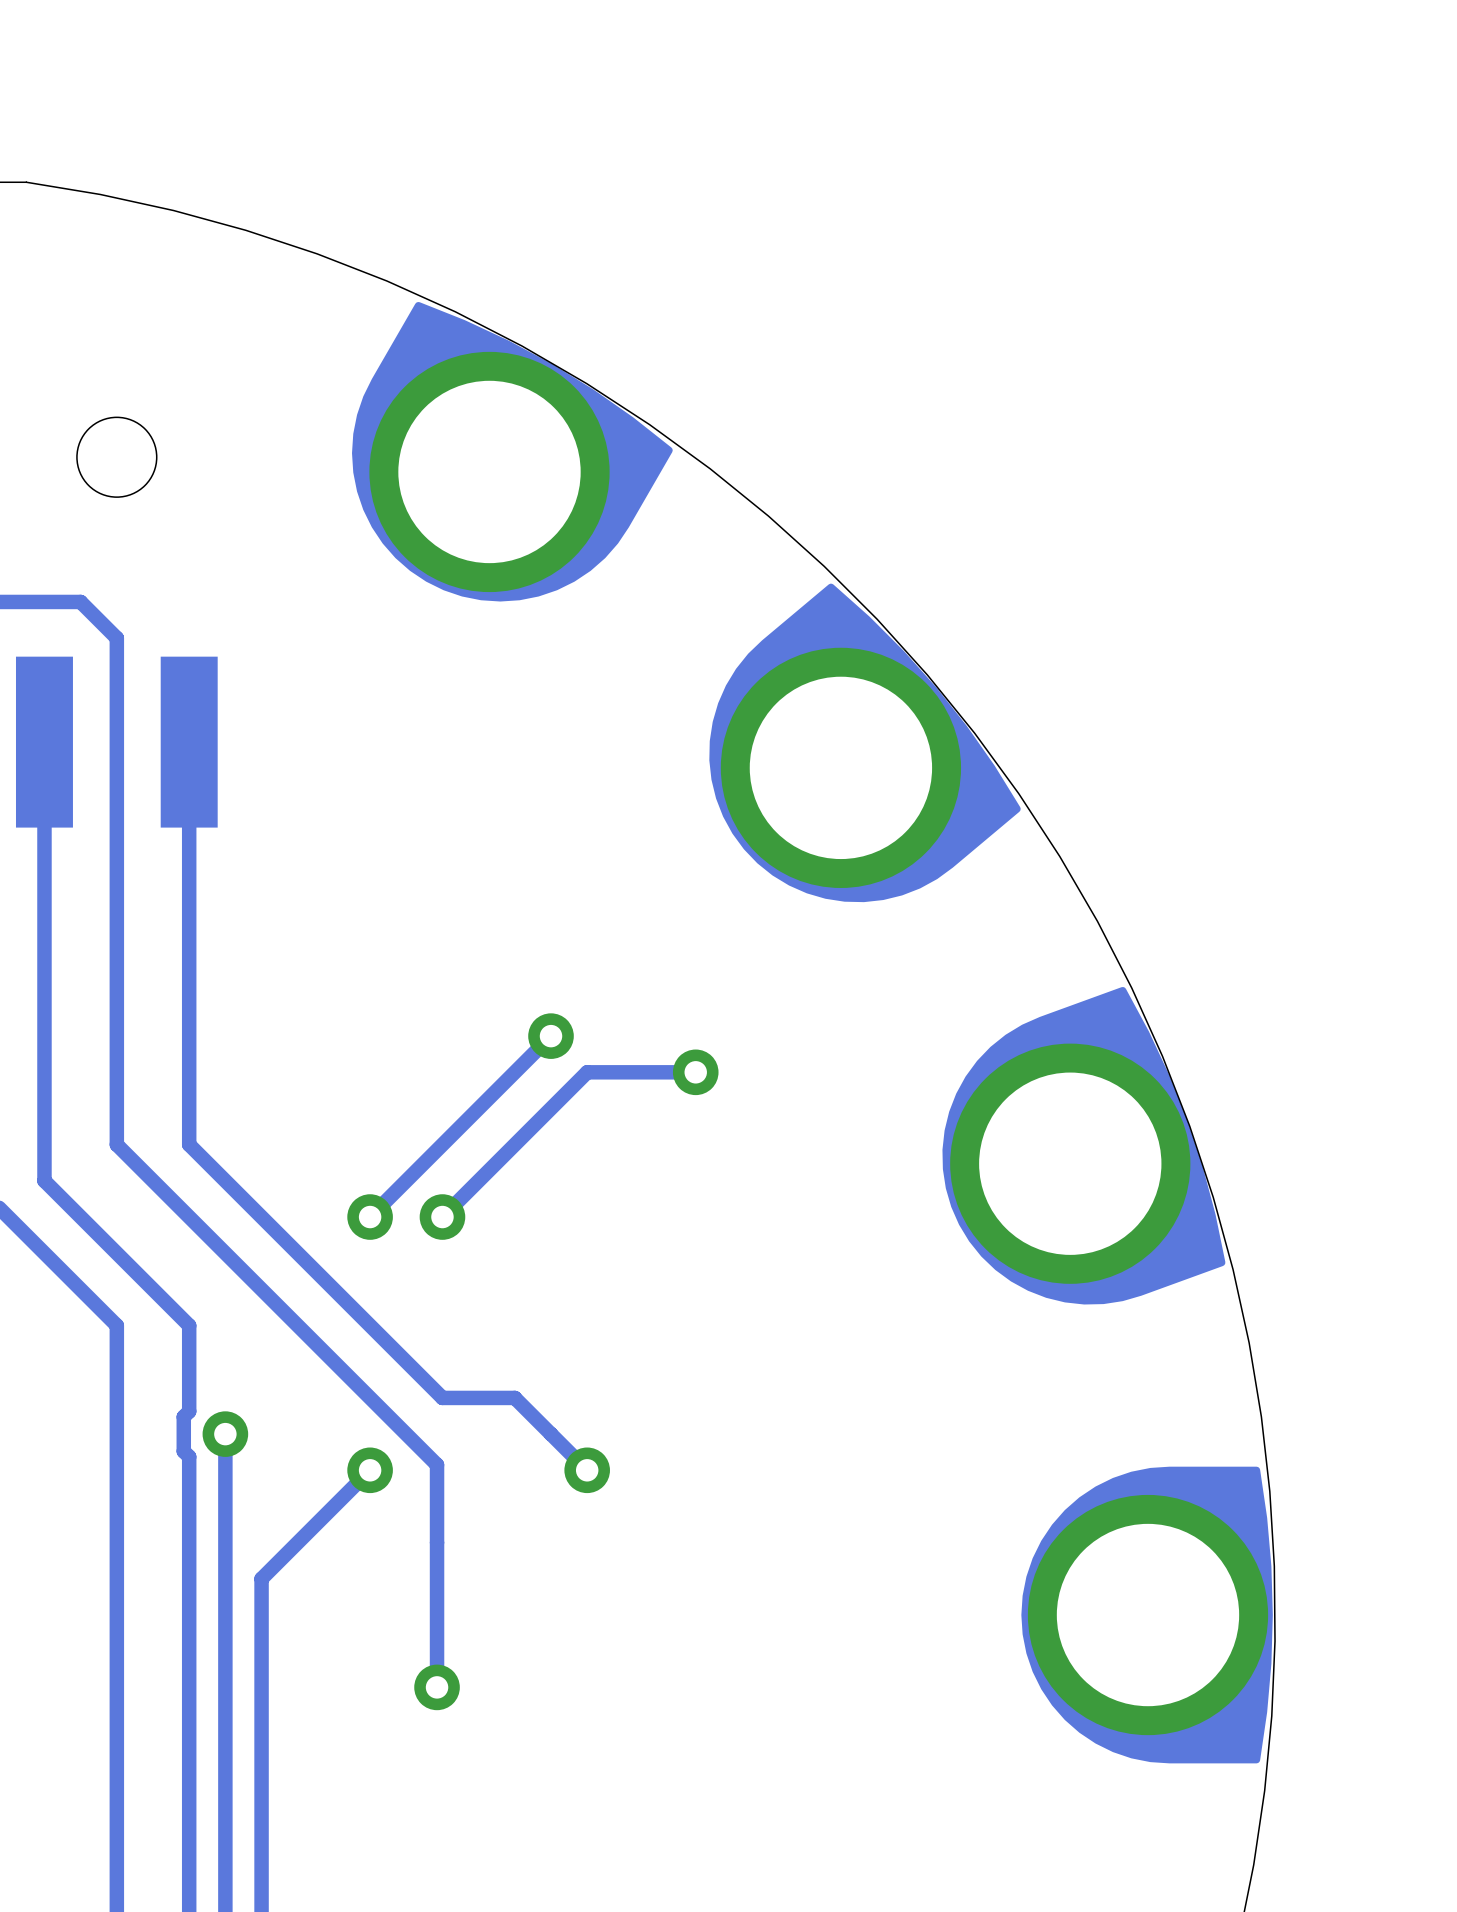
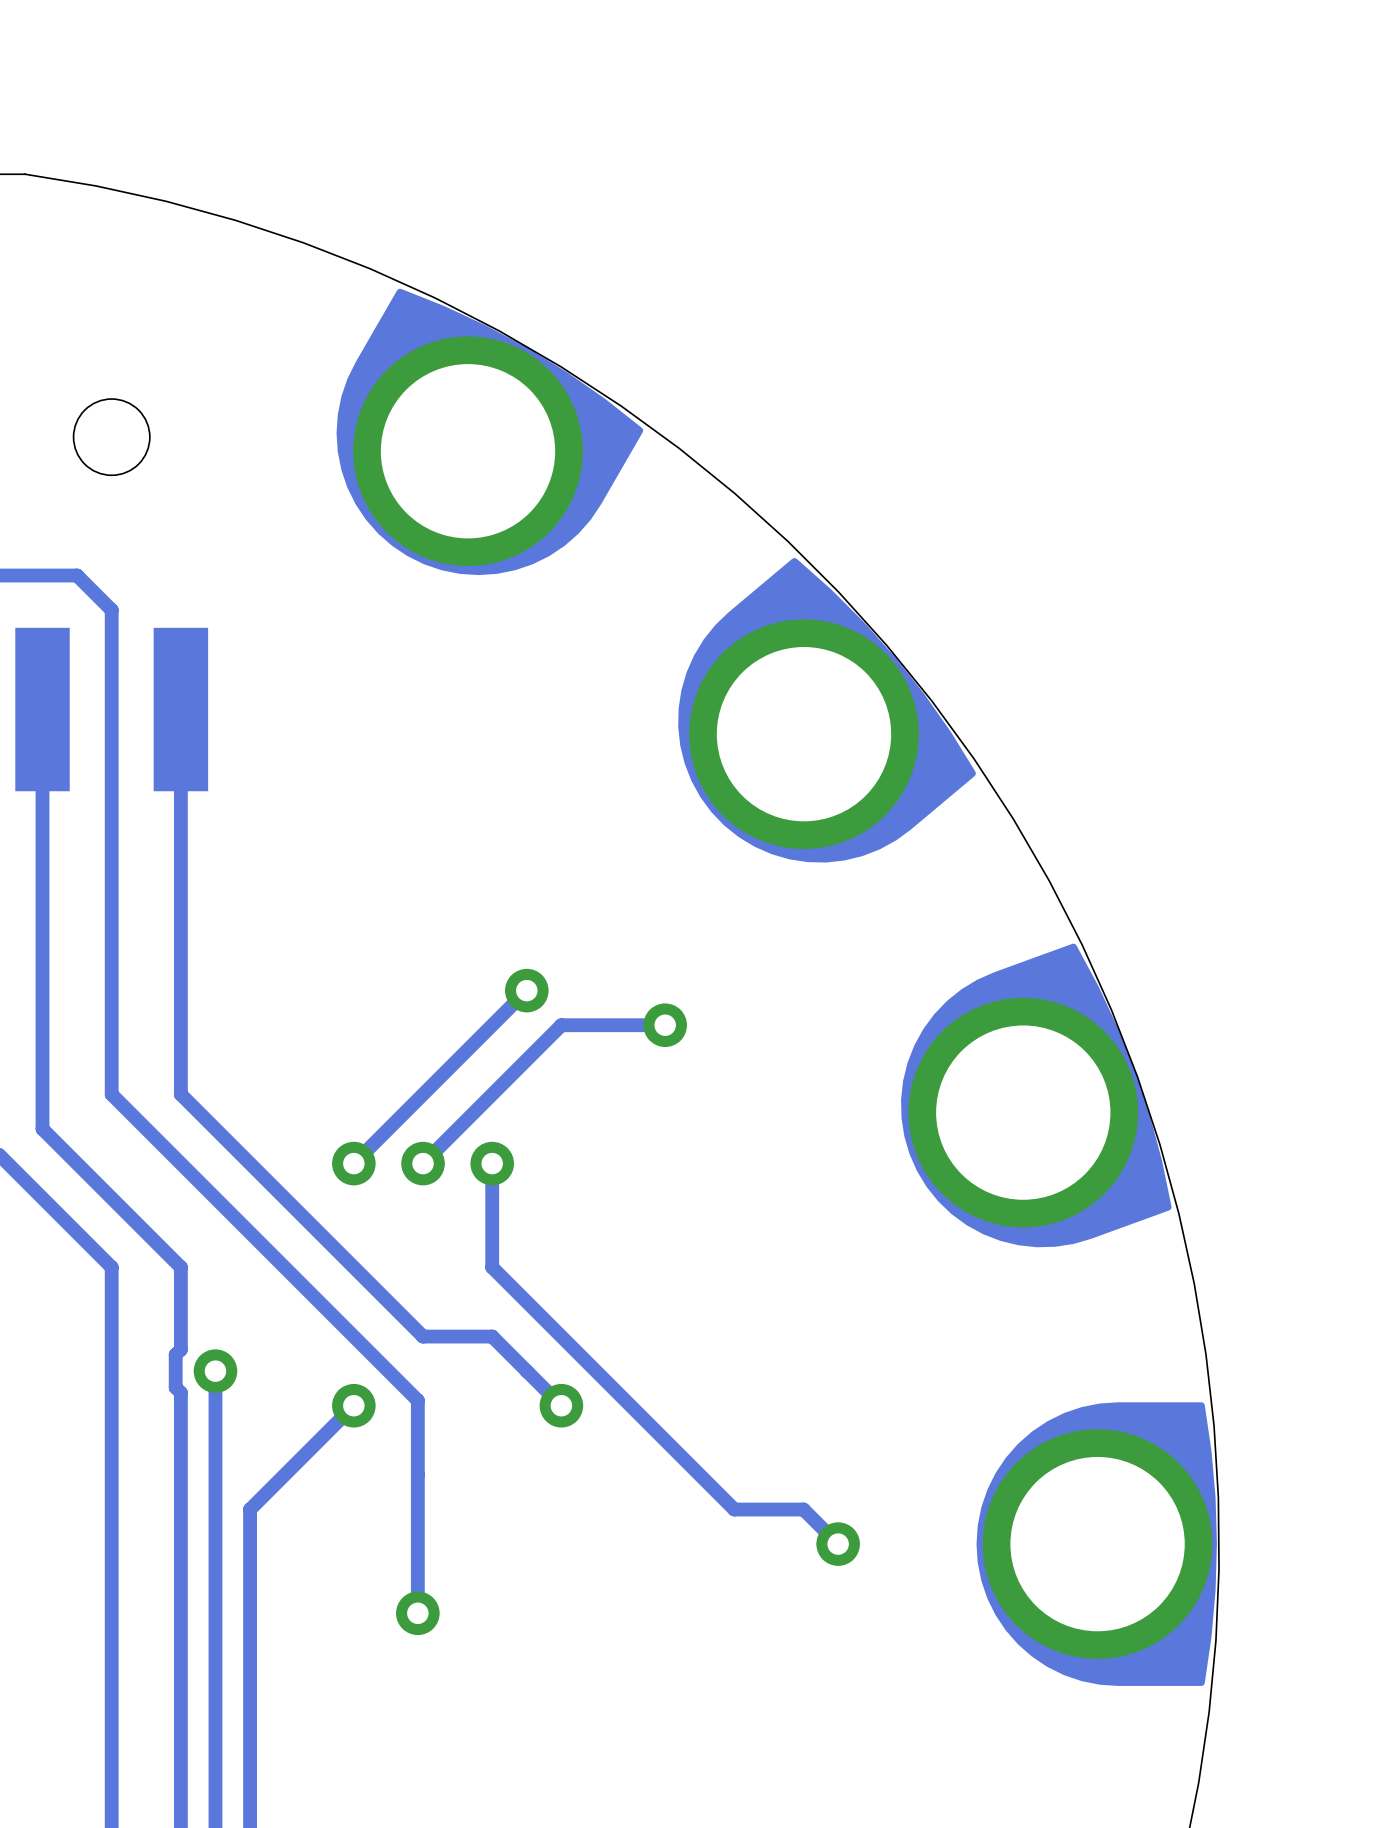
track: none -> (492, 1163) (492, 1267) (734, 1509) (803, 1509) (838, 1544)
via: none -> (492, 1163)
via: none -> (838, 1544)

